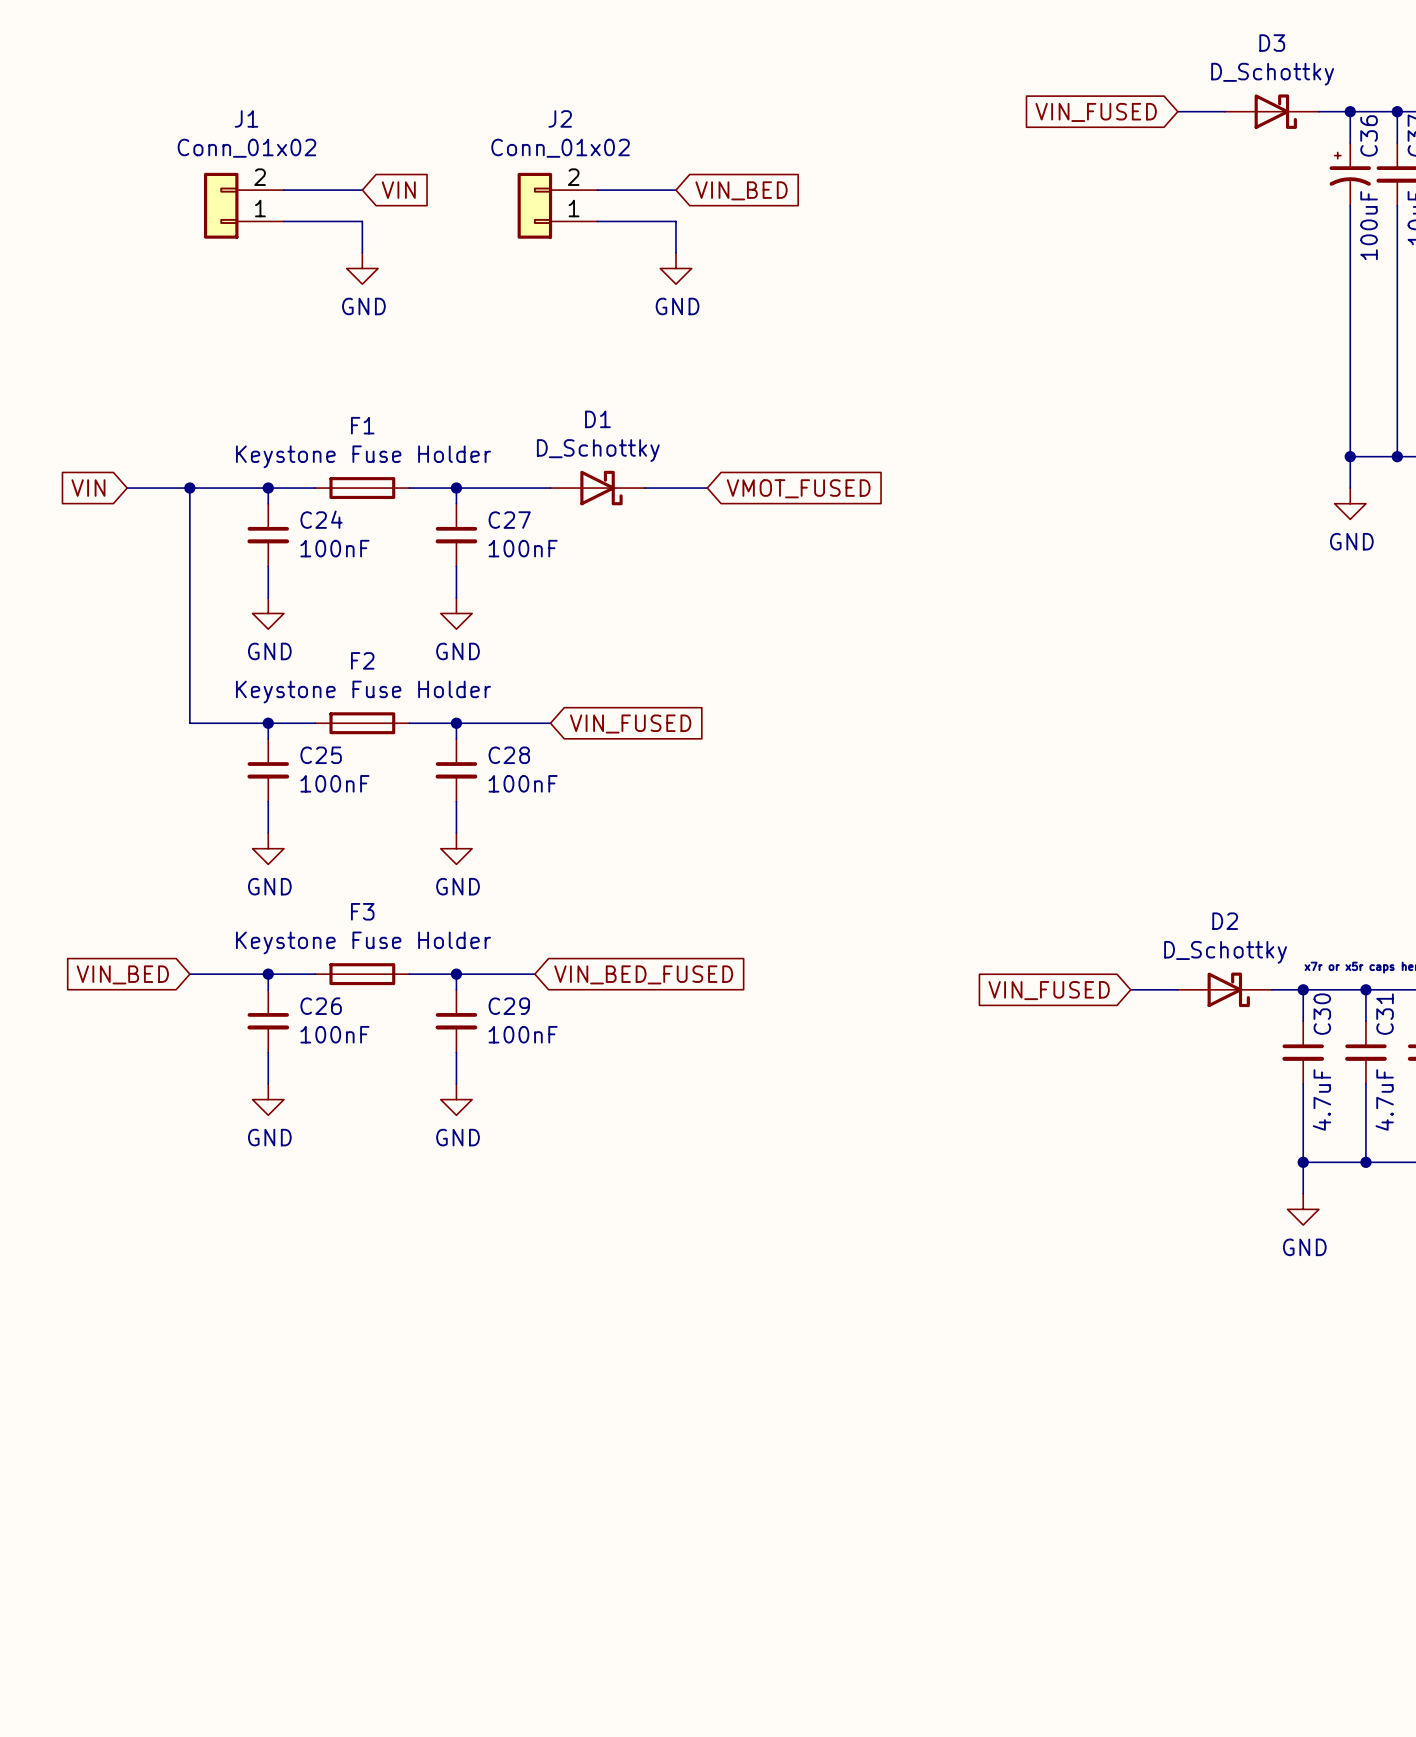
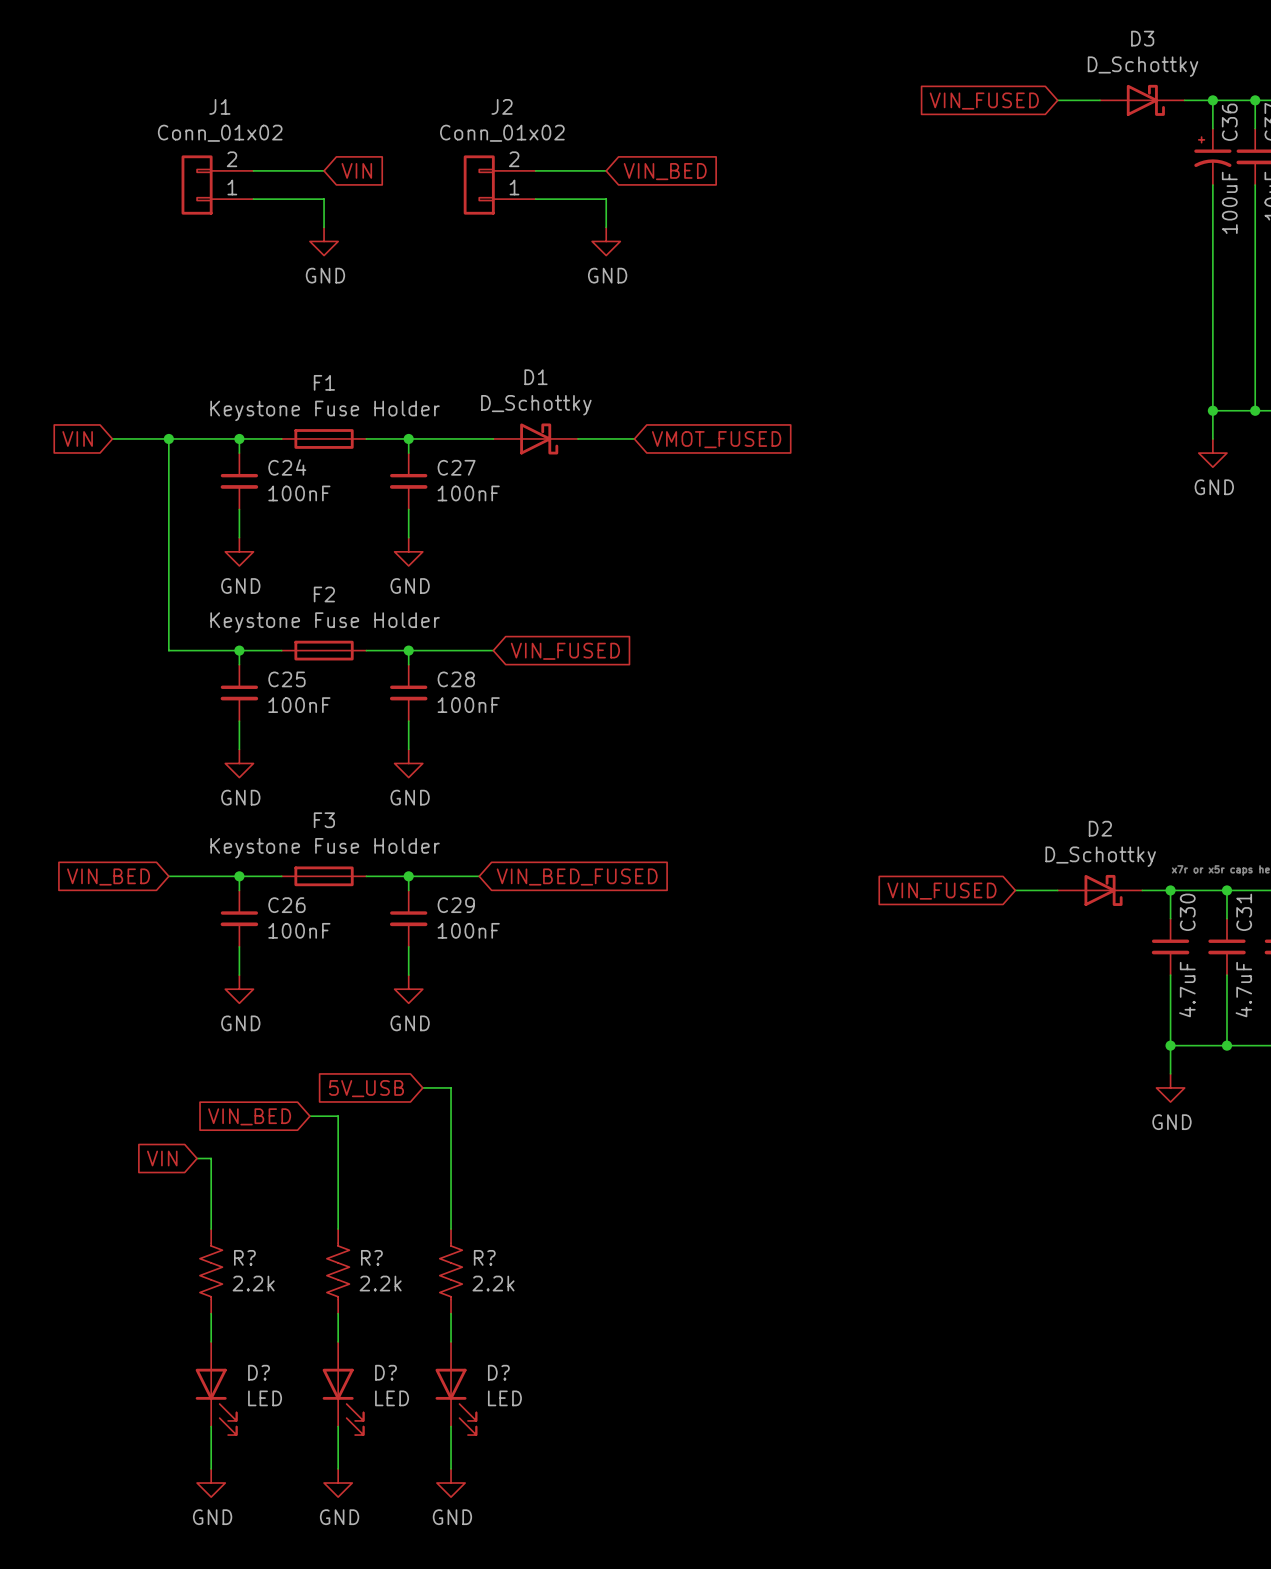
wire: none -> (422, 1087) (451, 1087) (451, 1229)
global label: none -> 5V_USB (366, 1088)
wire: none -> (309, 1116) (338, 1116) (338, 1229)
global label: none -> VIN_BED (249, 1116)
global label: none -> VIN (162, 1158)
wire: none -> (197, 1158) (211, 1158) (211, 1229)
R?: none -> 2.2k (211, 1271)
R?: none -> 2.2k (338, 1271)
R?: none -> 2.2k (451, 1271)
wire: none -> (211, 1313) (211, 1341)
wire: none -> (338, 1313) (338, 1341)
wire: none -> (451, 1313) (451, 1341)
D?: none -> LED (216, 1388)
D?: none -> LED (343, 1388)
D?: none -> LED (455, 1388)
wire: none -> (211, 1426) (211, 1468)
wire: none -> (338, 1426) (338, 1468)
wire: none -> (451, 1426) (451, 1468)
power symbol: none -> GND (211, 1483)
power symbol: none -> GND (338, 1483)
power symbol: none -> GND (451, 1483)

